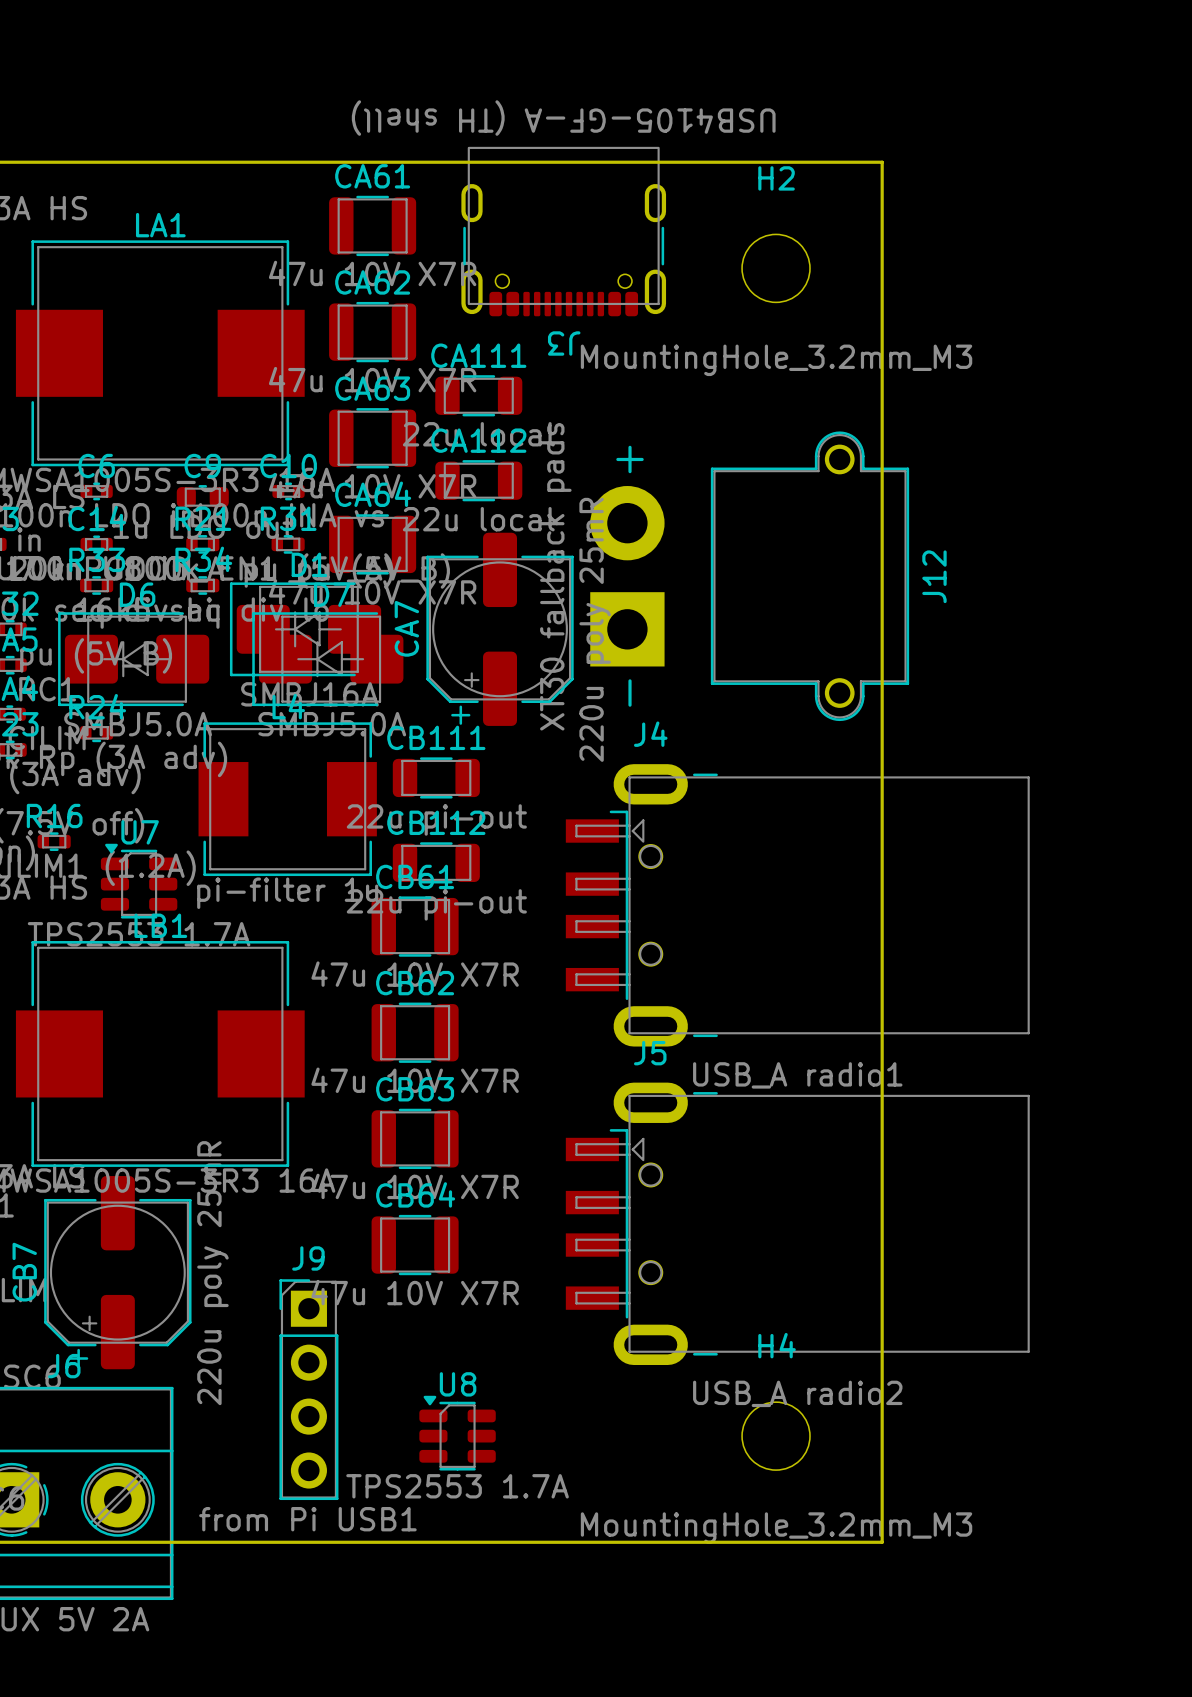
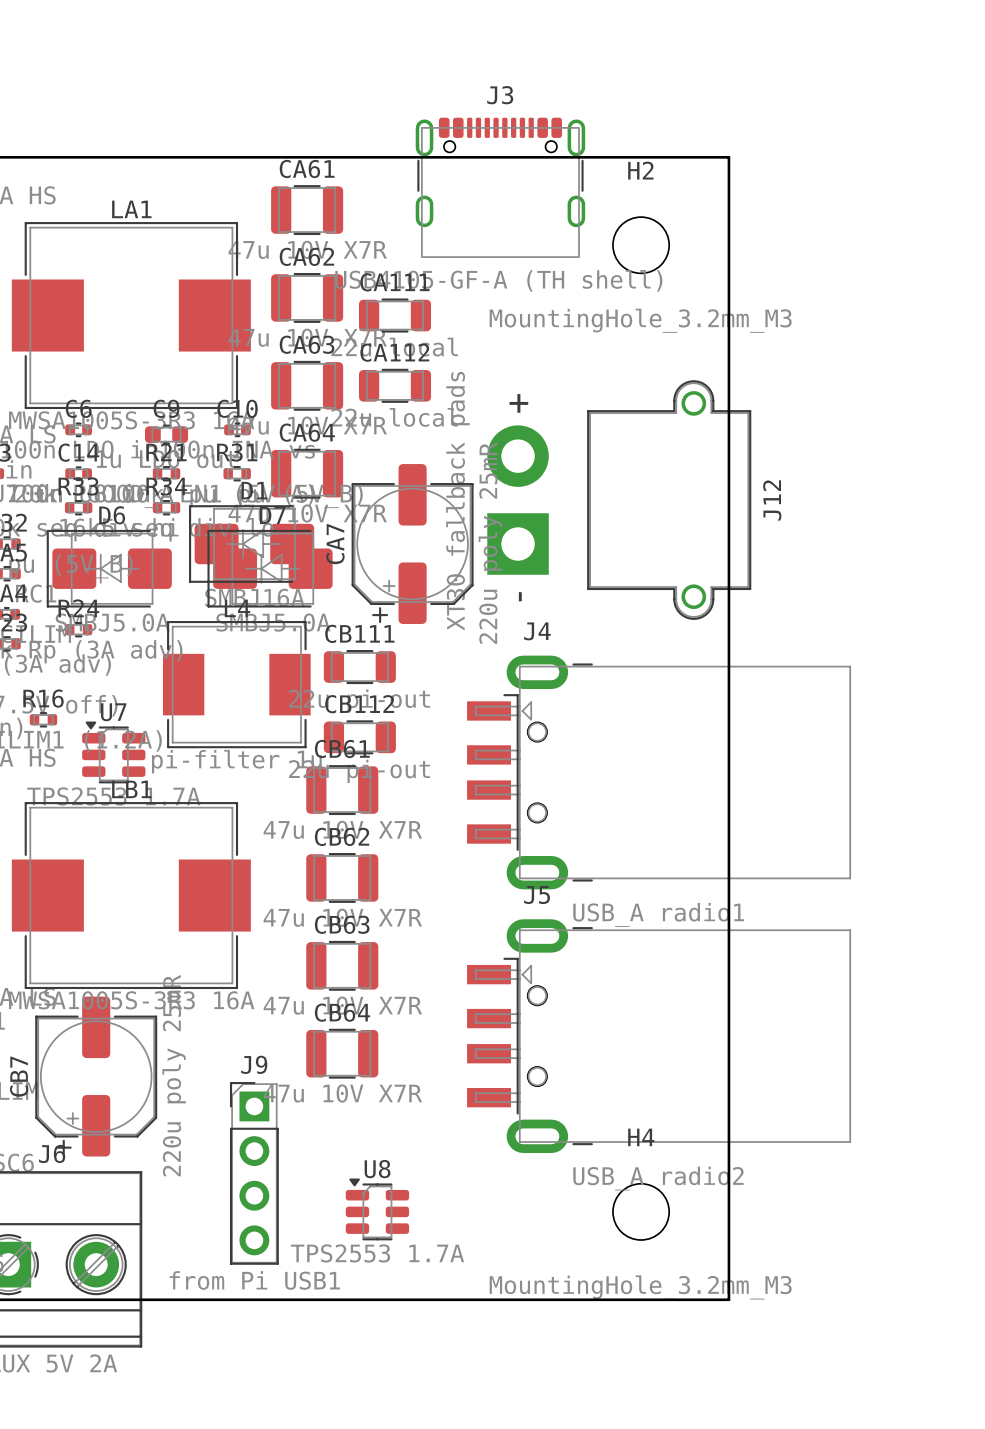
J3 rotation: 0° (563, 231) -> 180° (500, 187)
CA111 position: (478, 395) -> (395, 315)
CA112 position: (478, 480) -> (395, 385)

